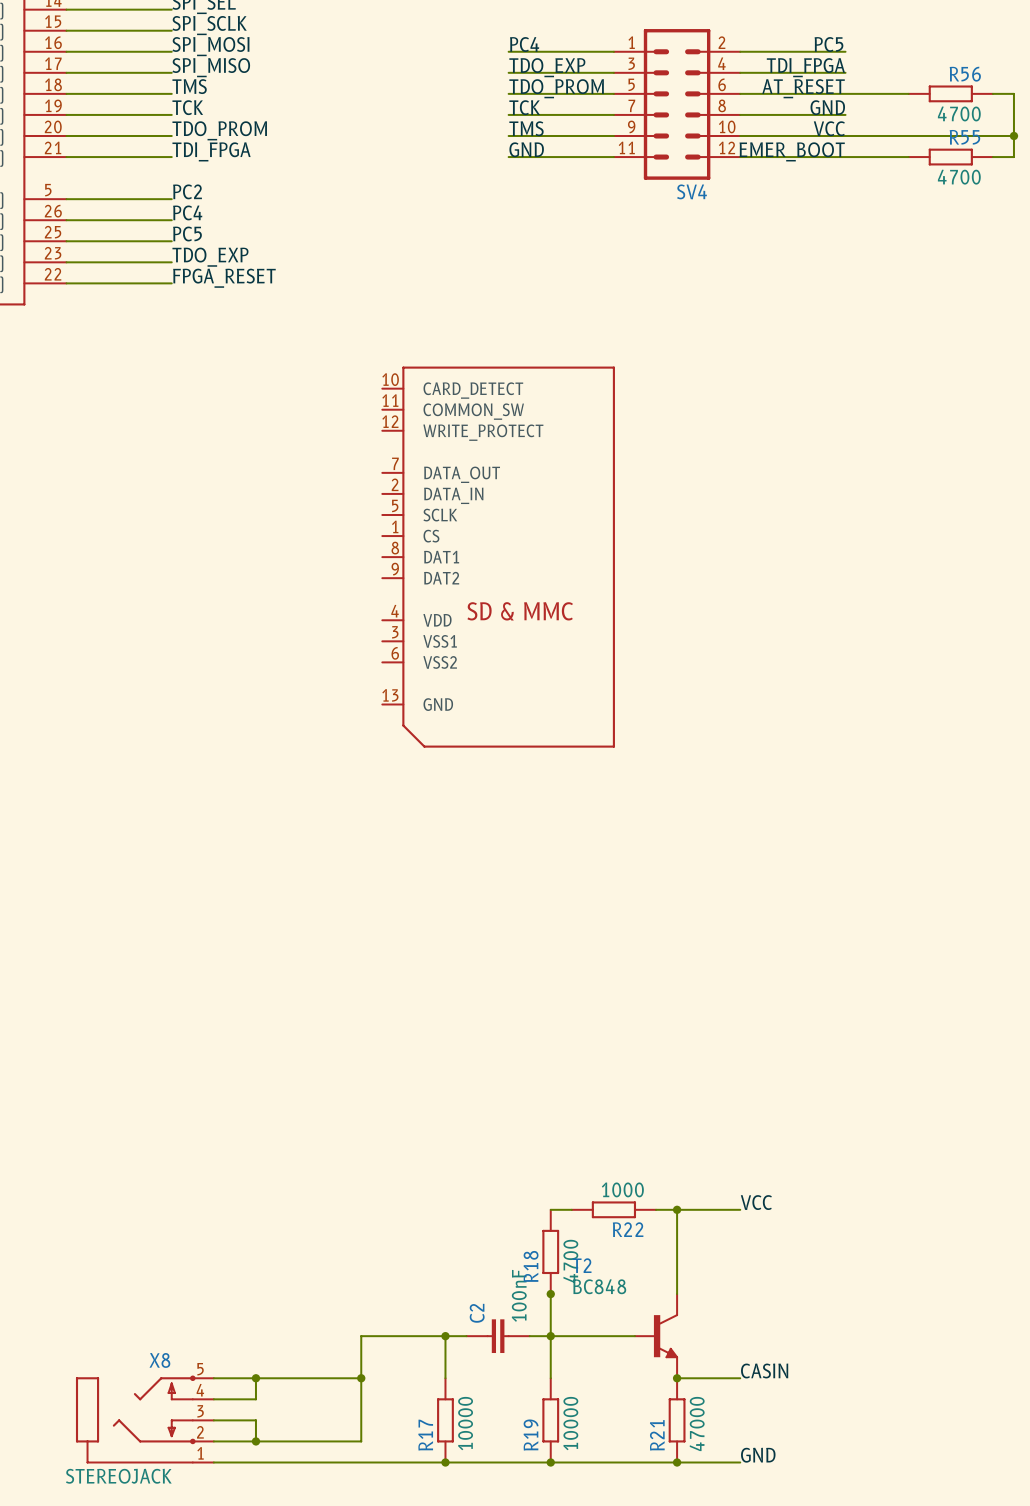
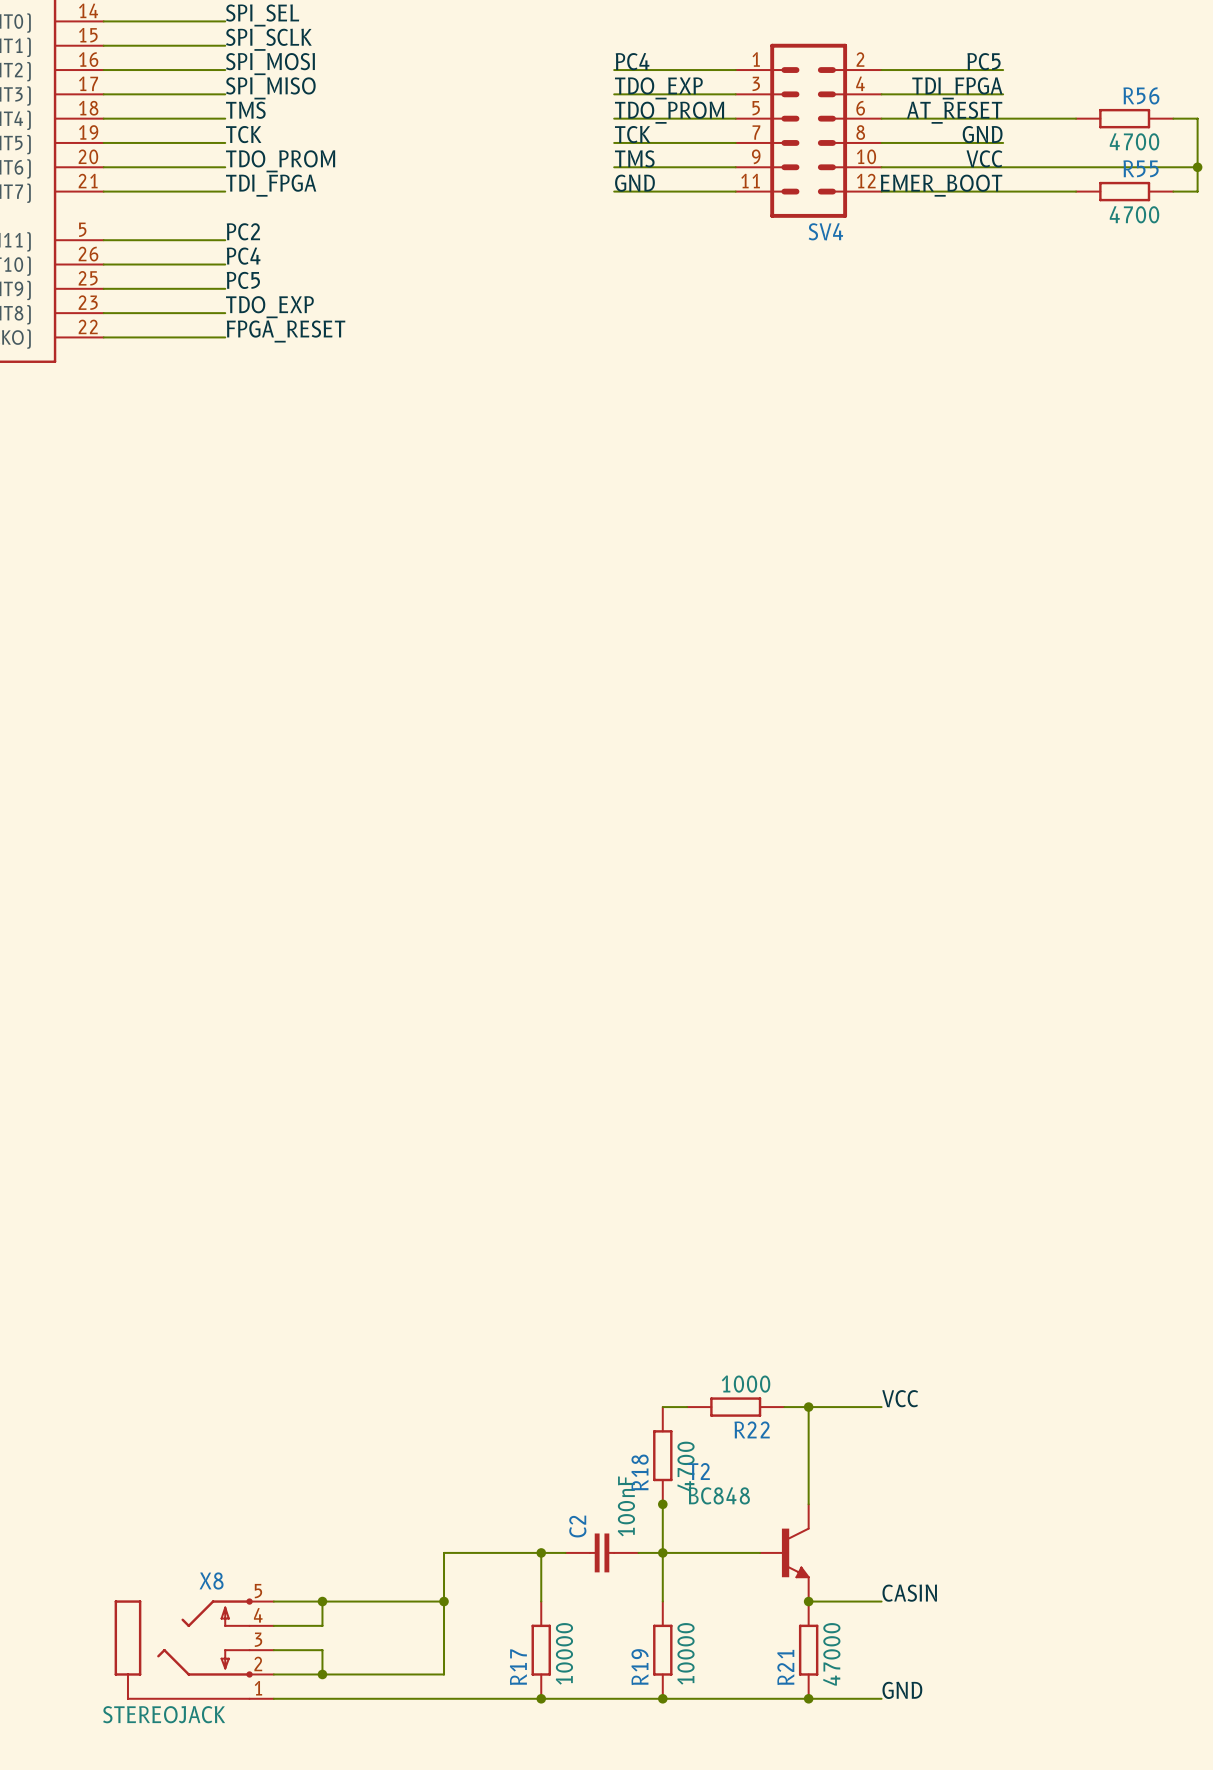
part: (498, 557) -> none

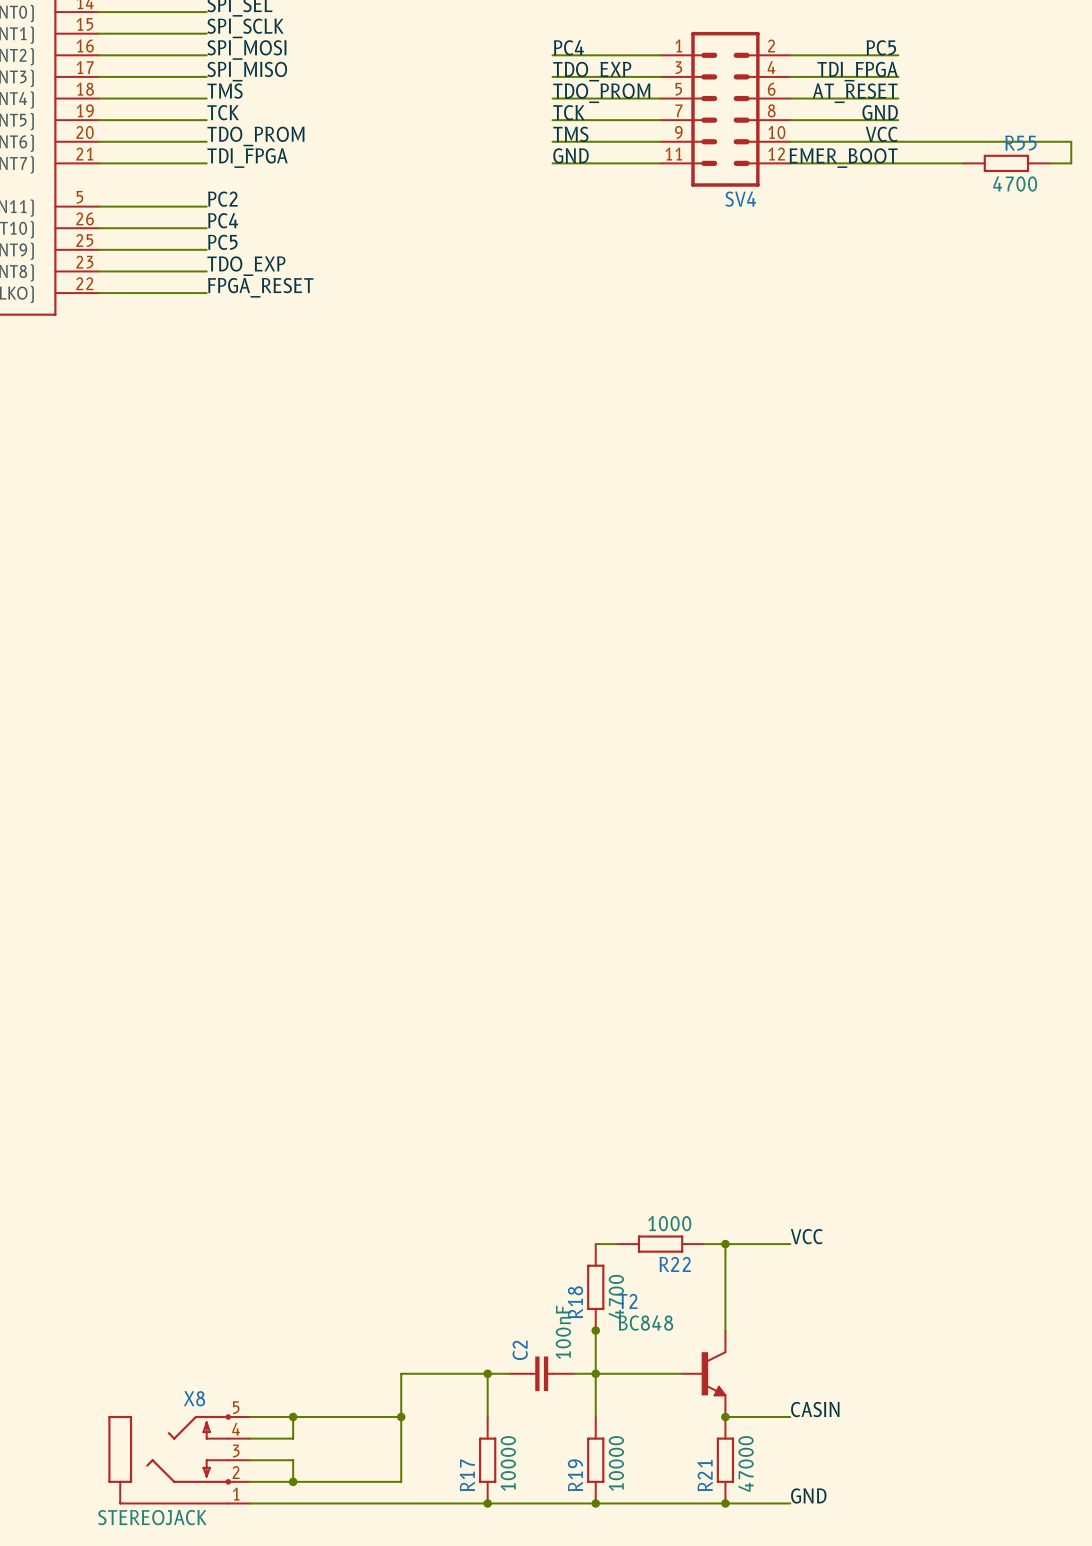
wire: (1003, 118) (1076, 118) -> none
R56: 4700 (1124, 118) -> none
wire: (1173, 118) (1197, 118) (1197, 167) -> none
junction: (1197, 167) -> none

